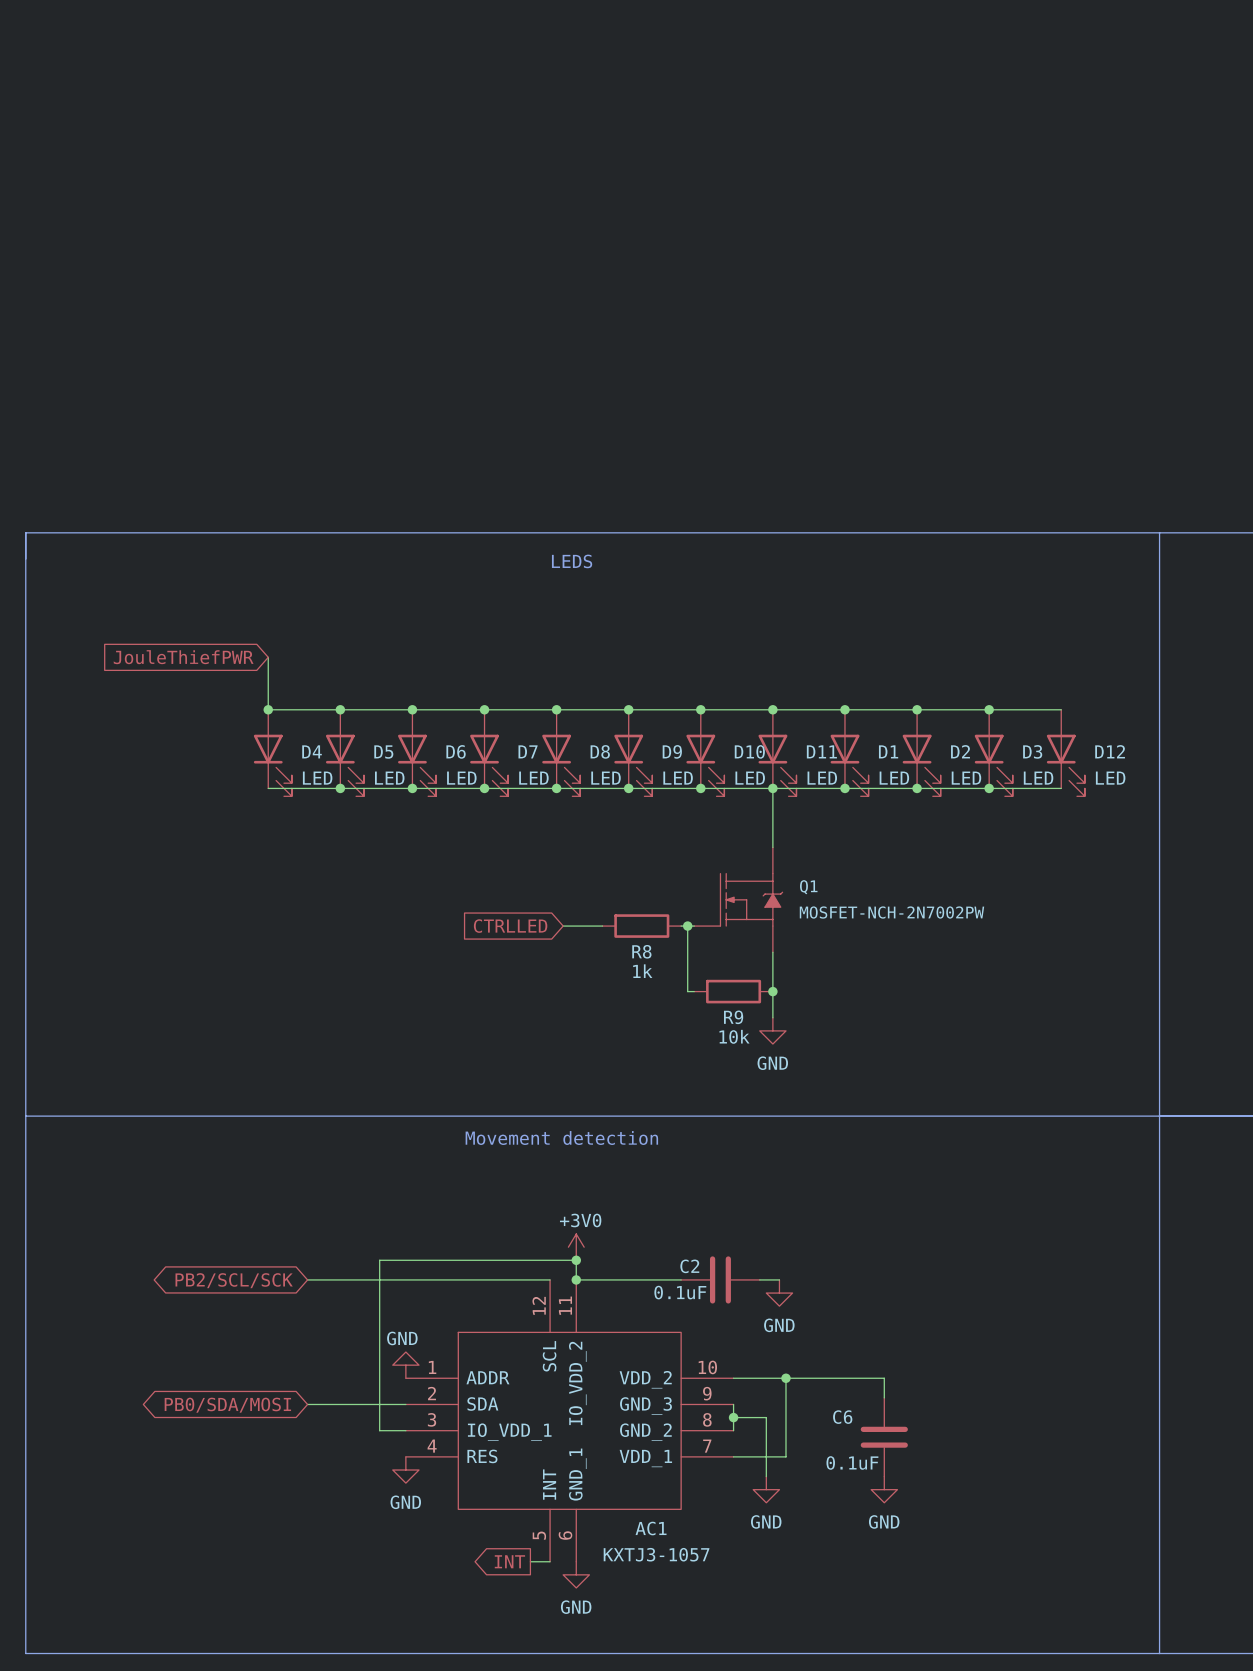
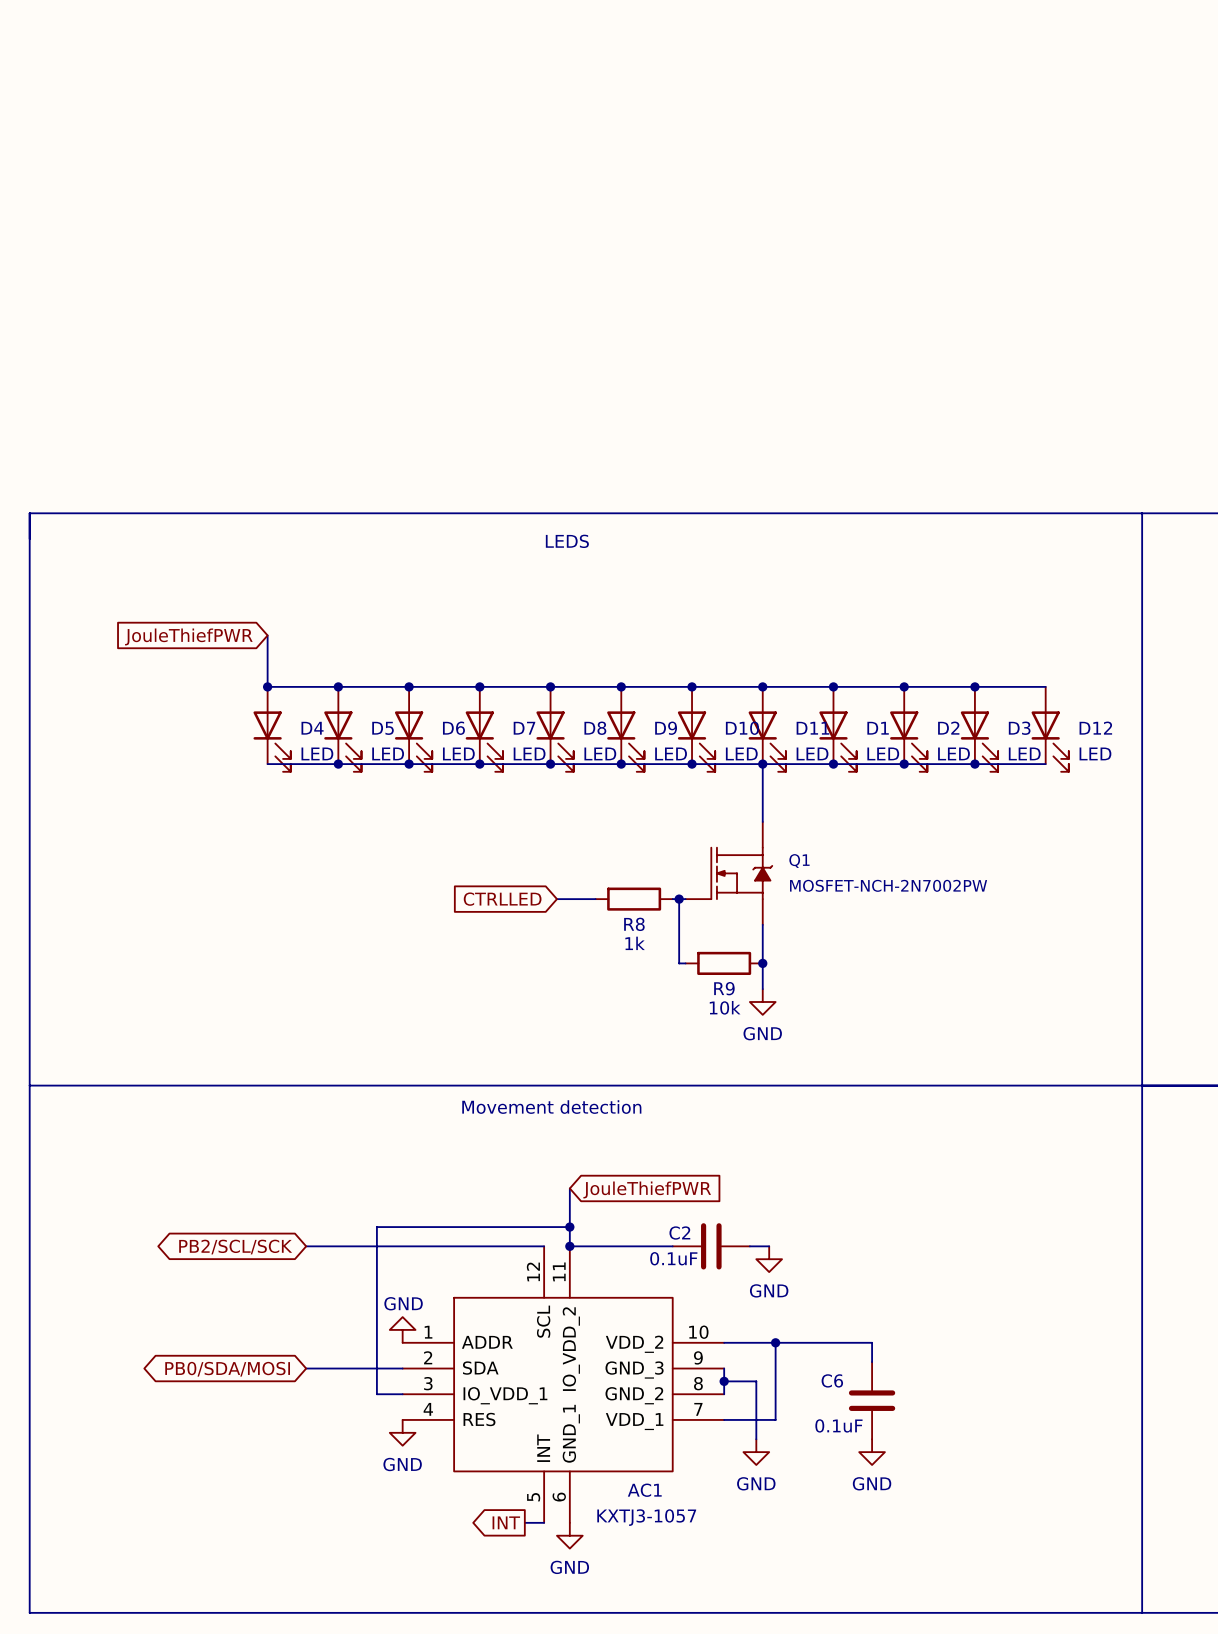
global label: none -> JouleThiefPWR (647, 1189)
power symbol: +3V0 (576, 1247) -> none

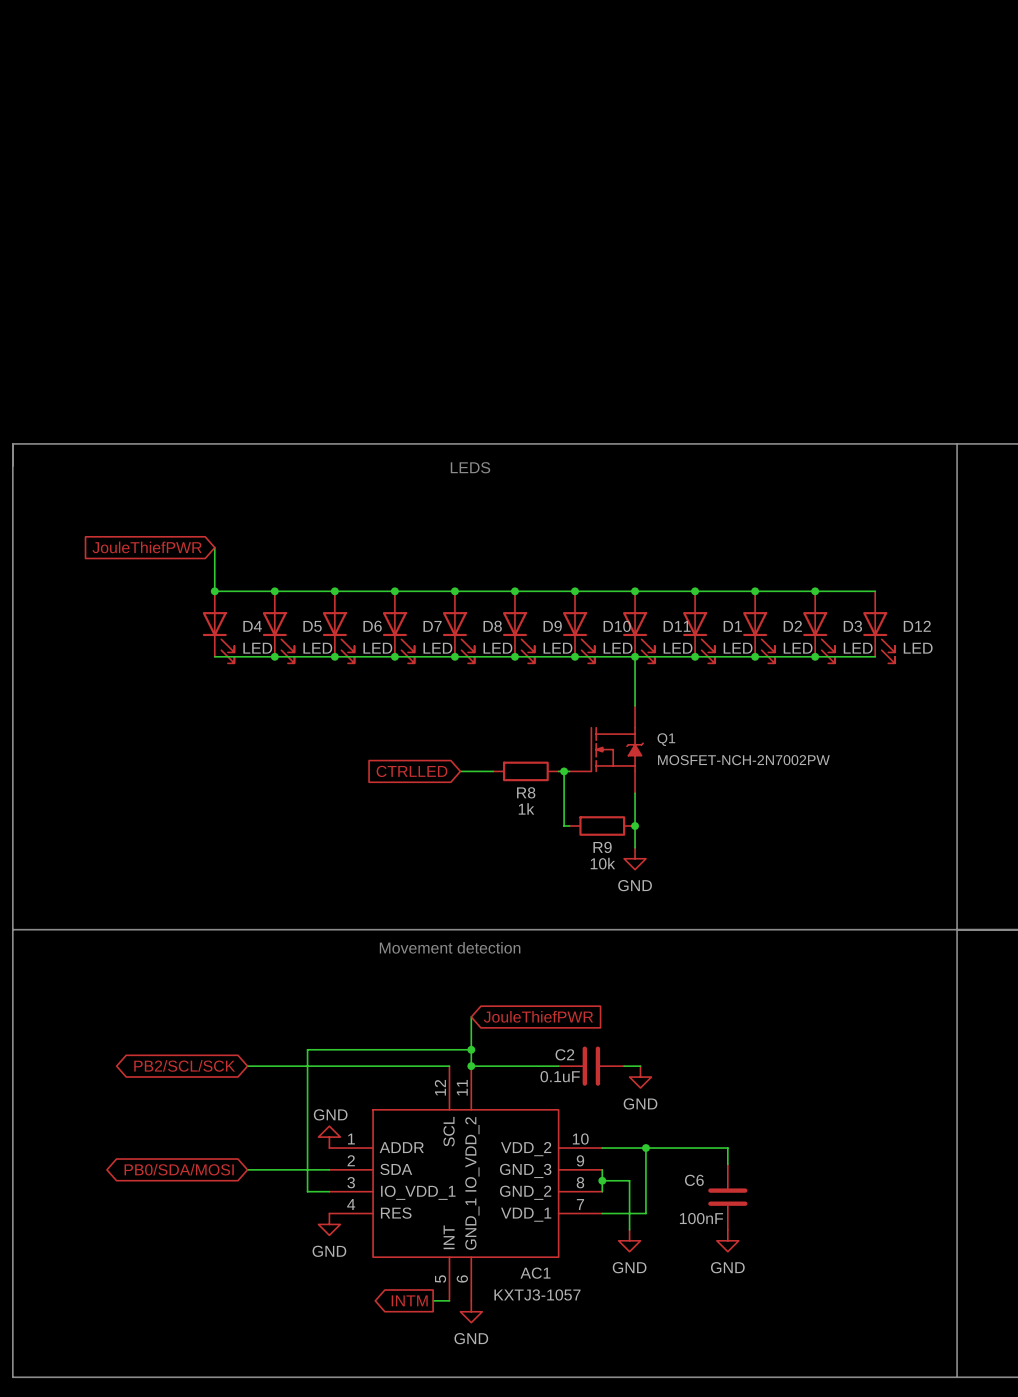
C6 value: 0.1uF (838, 1425) -> 100nF (701, 1218)
global label: INT (506, 1522) -> INTM (409, 1300)

